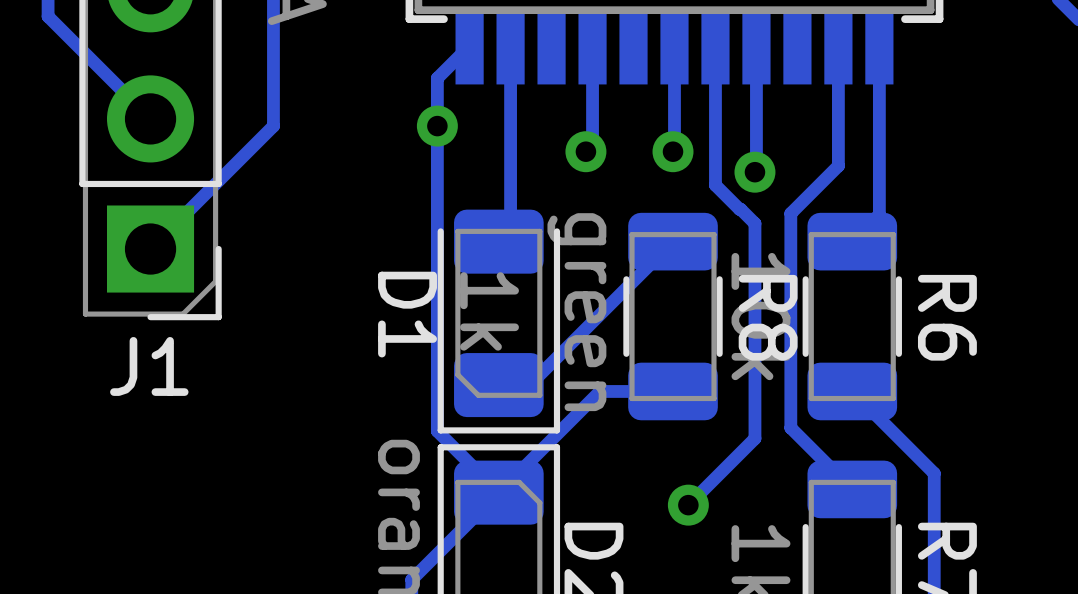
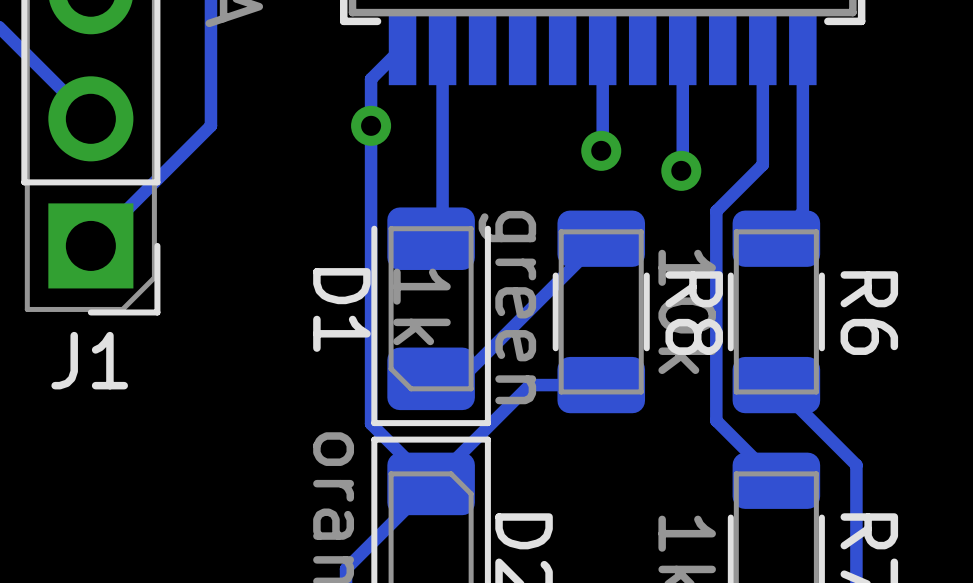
track: (592, 46) (592, 145) (585, 151) -> none
track: (715, 46) (715, 185) (754, 223) (754, 438) (688, 505) -> none
via: (585, 151) -> none
via: (688, 505) -> none

